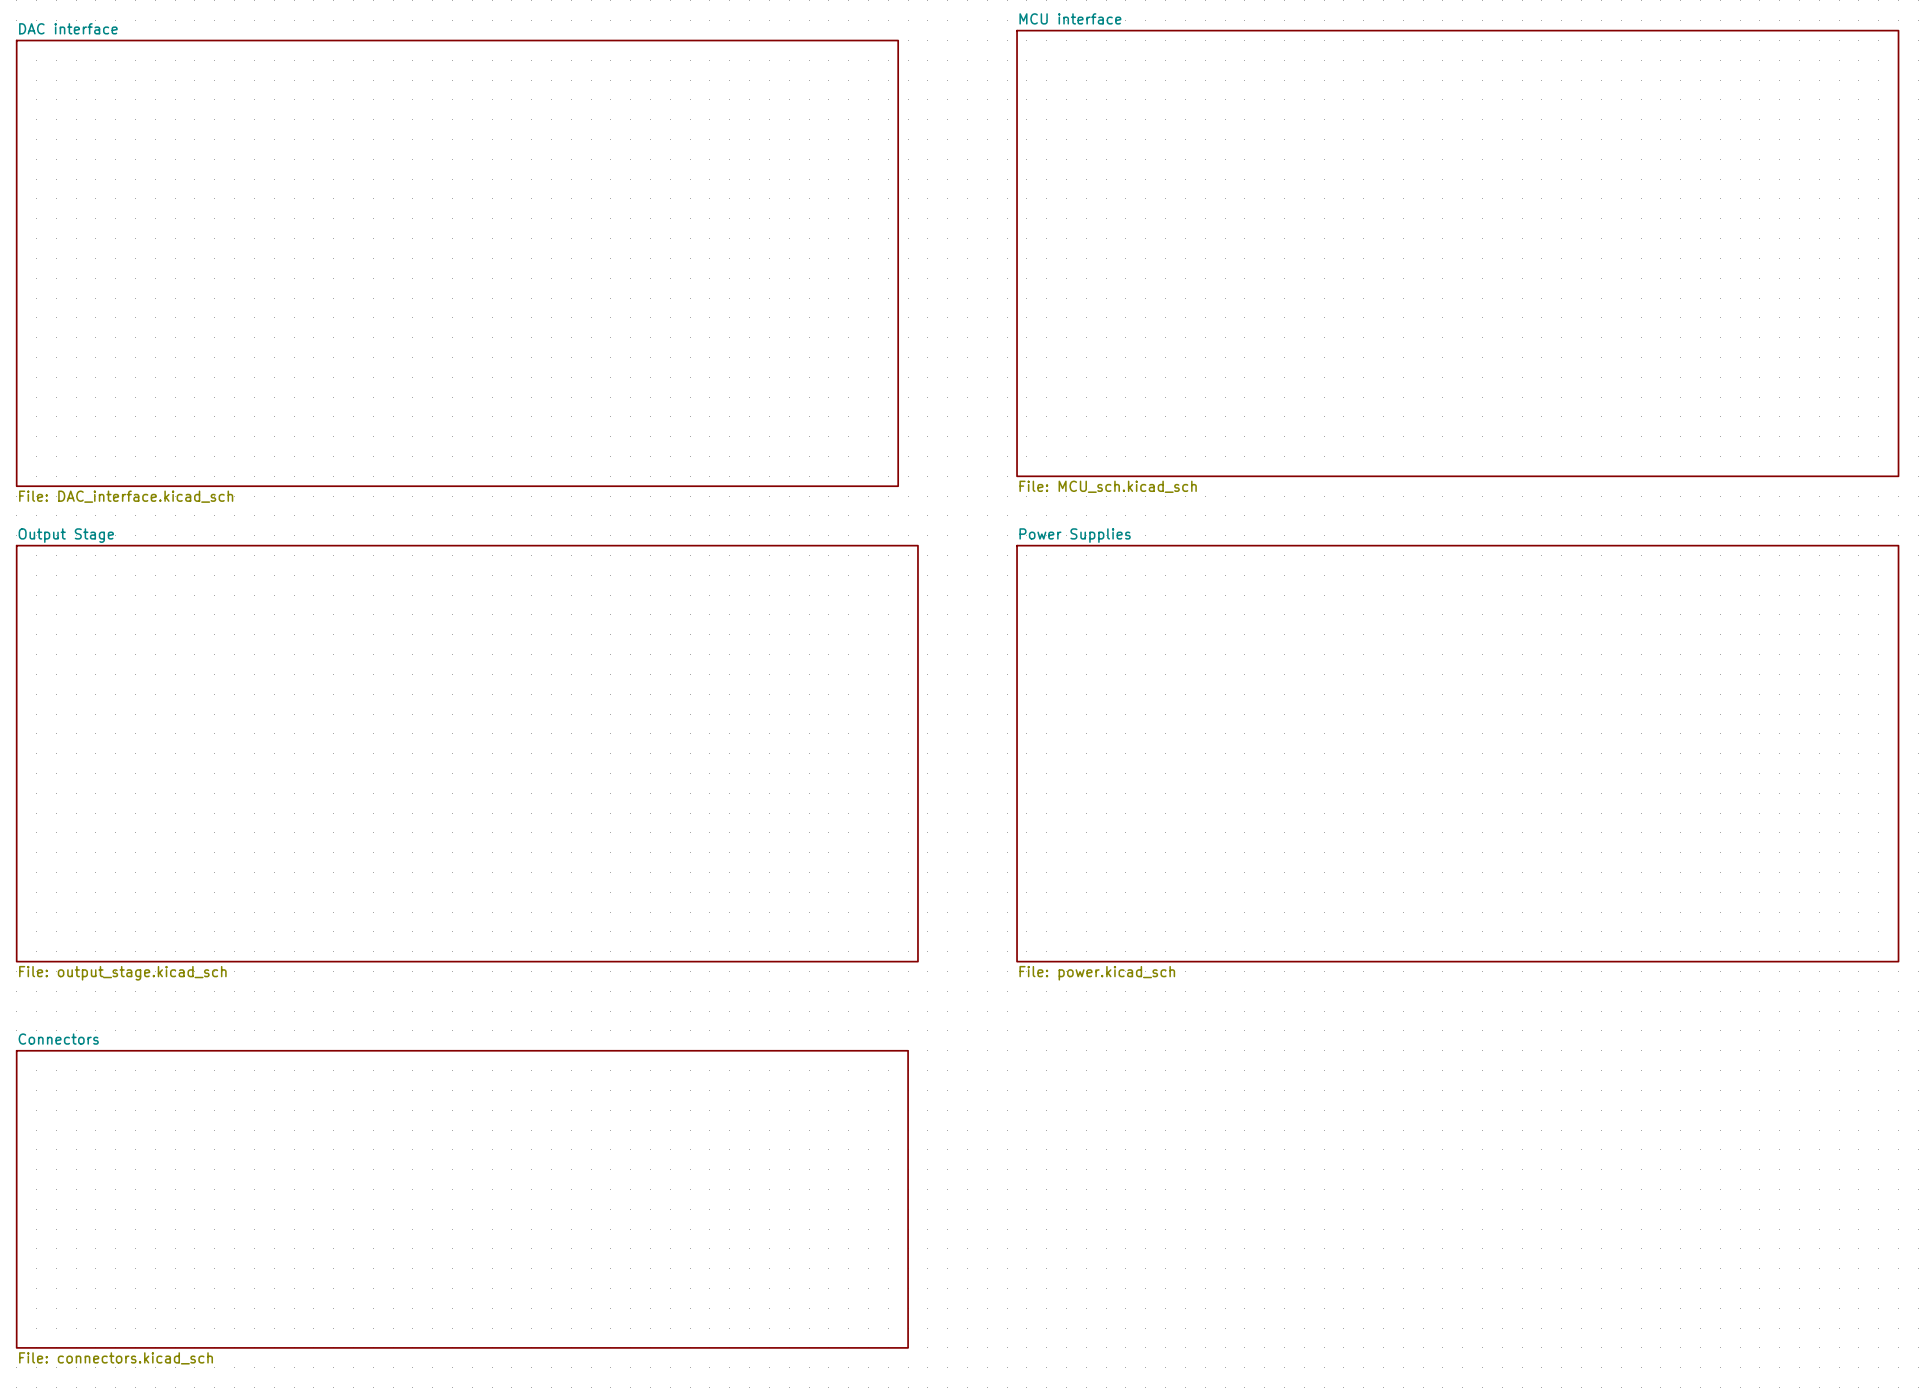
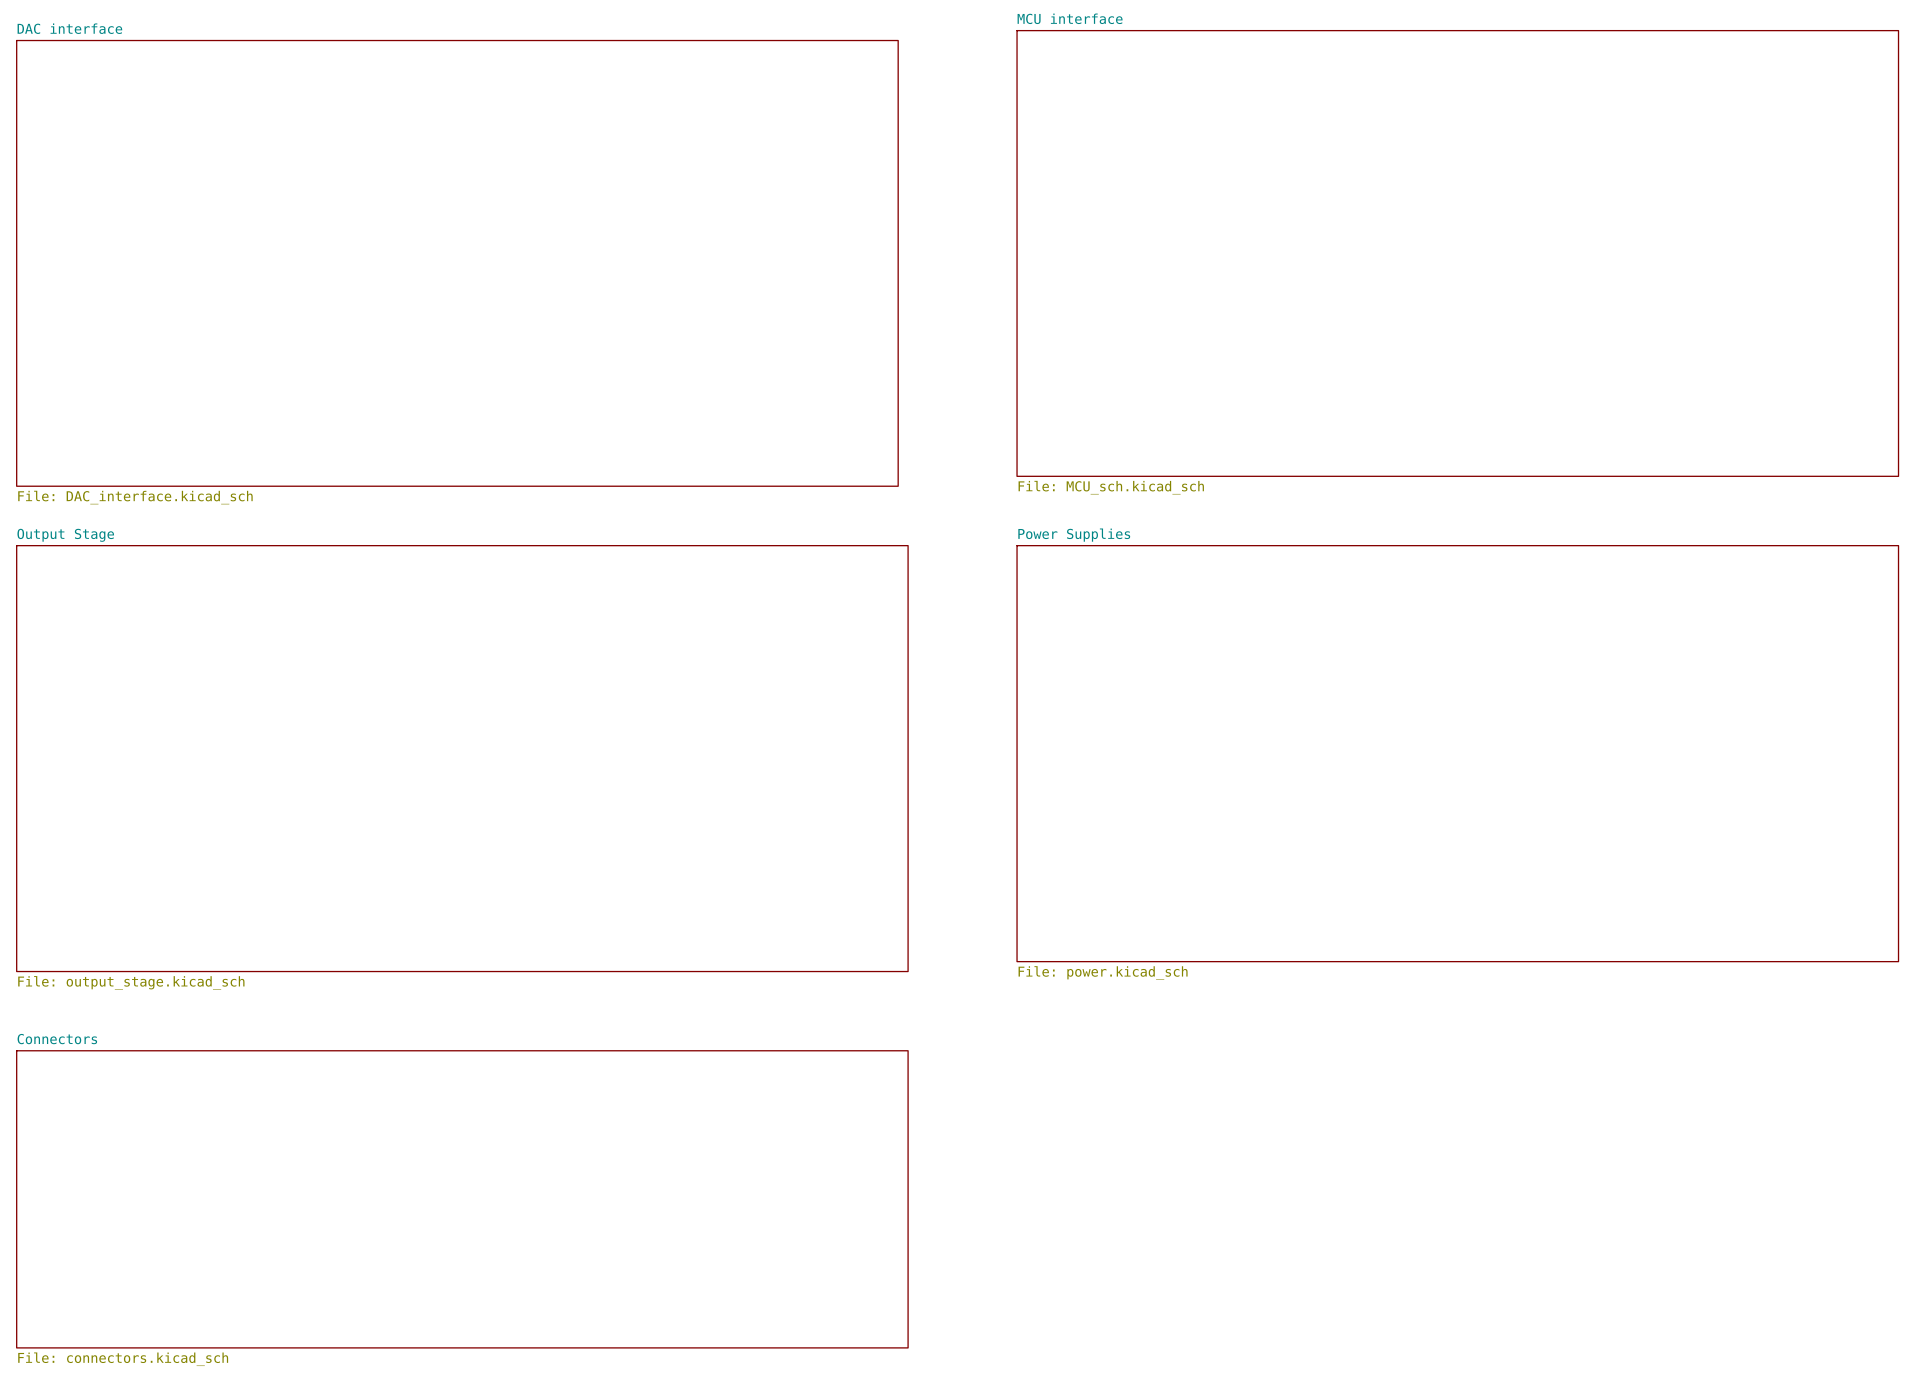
sheet Output Stage shape: [16, 545, 919, 963] -> [16, 545, 909, 973]

